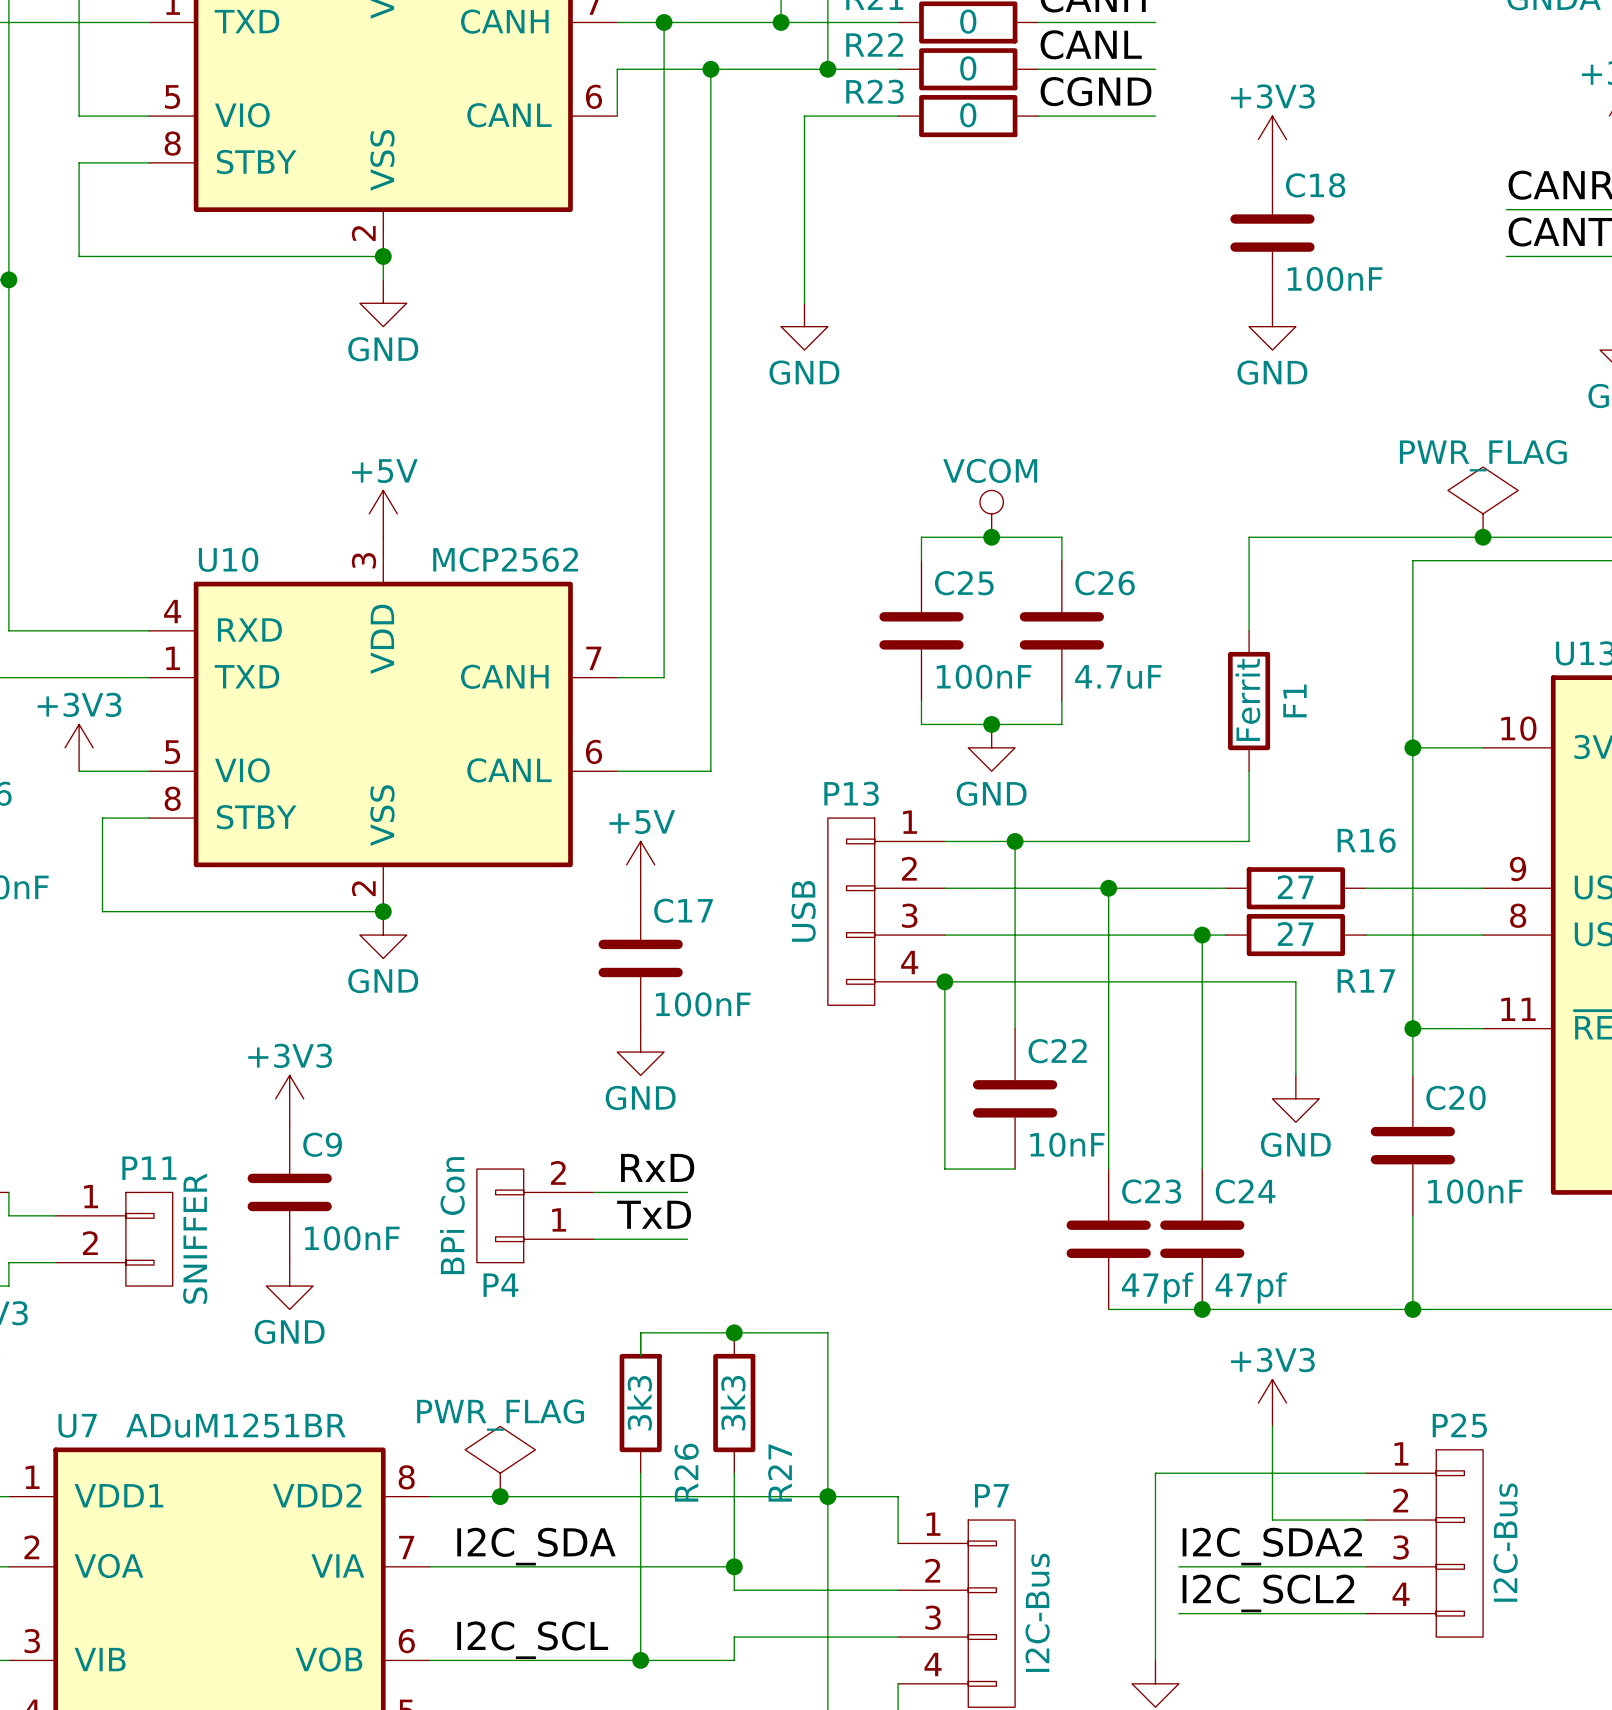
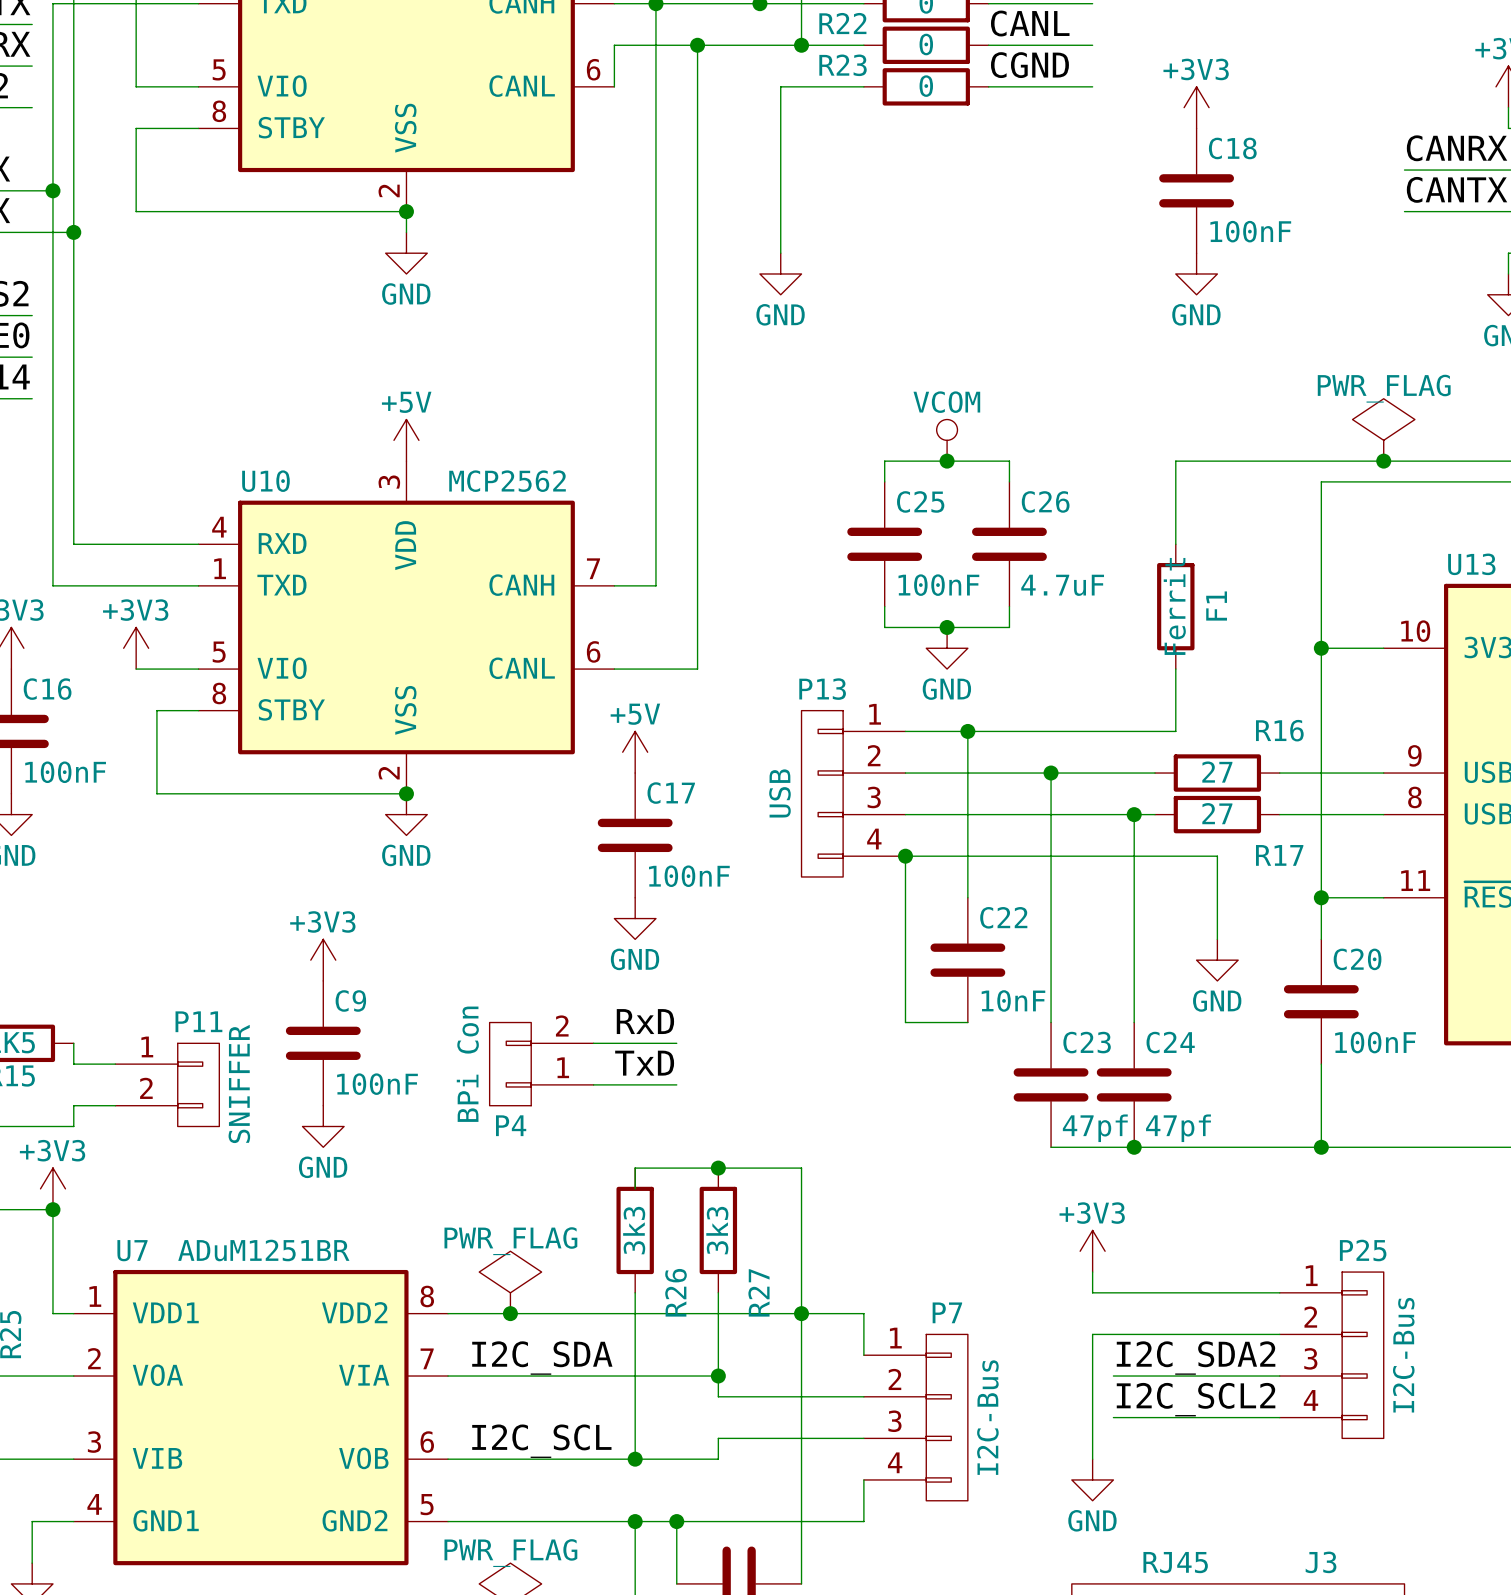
power symbol position: +3V3 (1272, 1403) -> +3V3 (1092, 1251)
wire: (1272, 1426) (1272, 1520) -> (1092, 1334) (1196, 1334)
wire: (1155, 1473) (1155, 1520) -> (1092, 1292) (1092, 1272)

